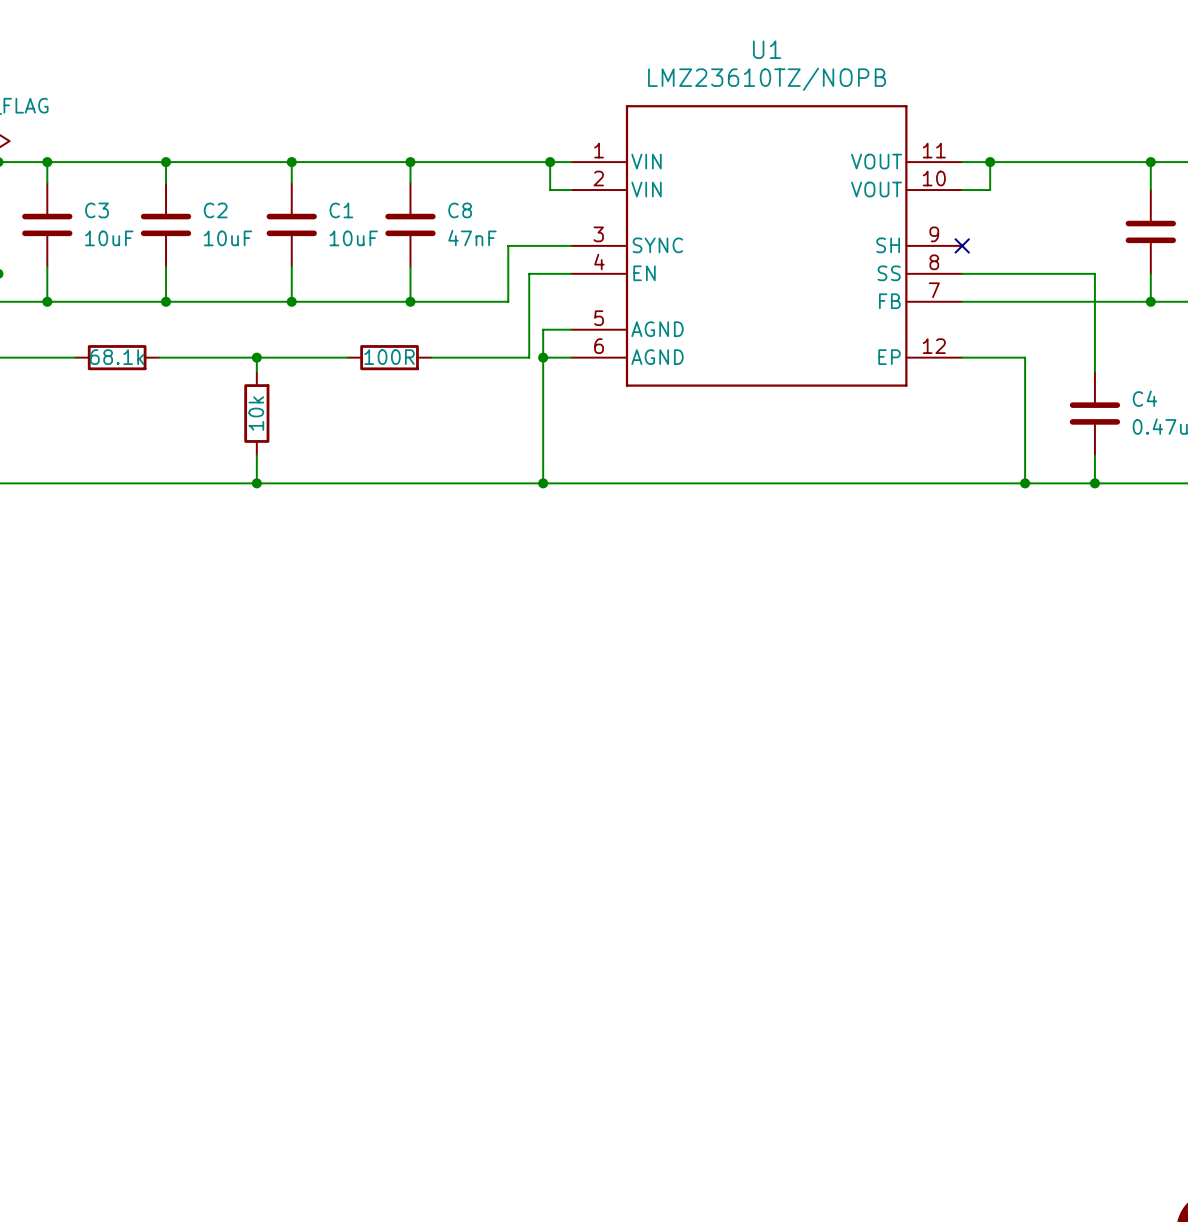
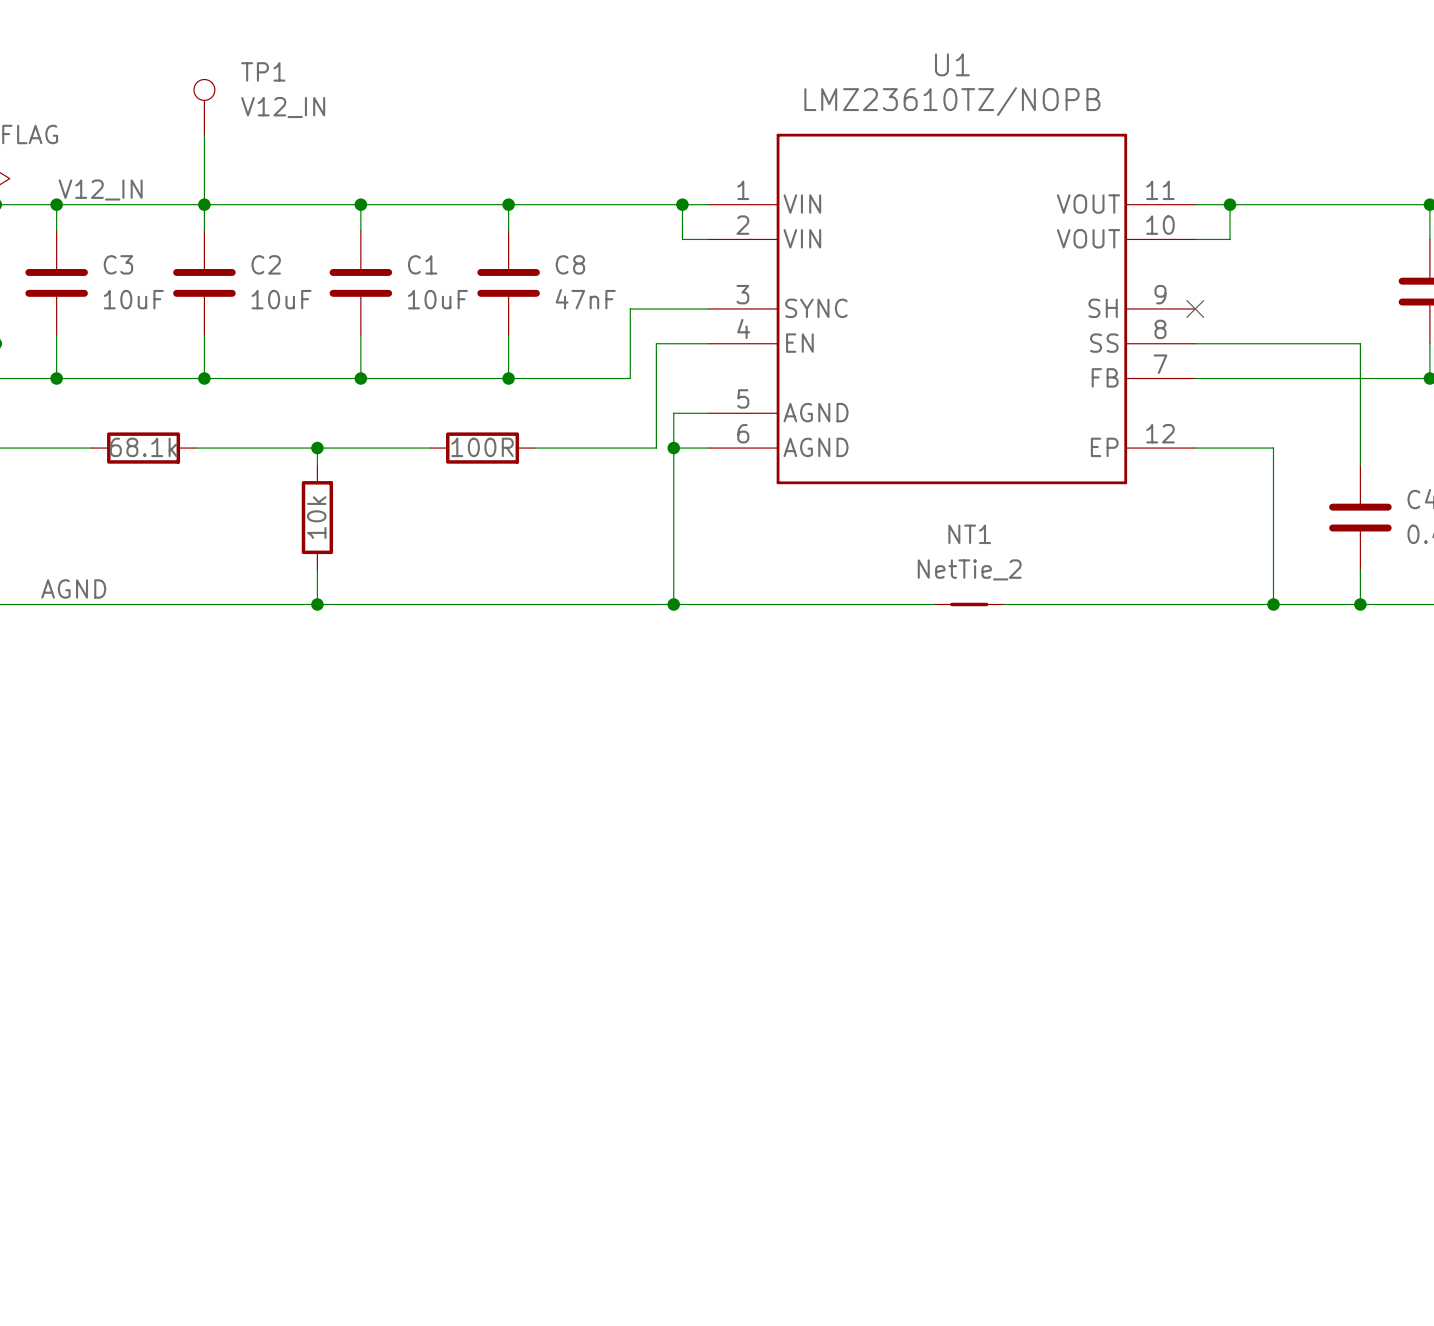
TP1: none -> V12_IN (204, 107)
wire: none -> (204, 135) (204, 204)
label: none -> V12_IN (100, 189)
label: none -> AGND (73, 588)
NT1: none -> NetTie_2 (969, 604)

